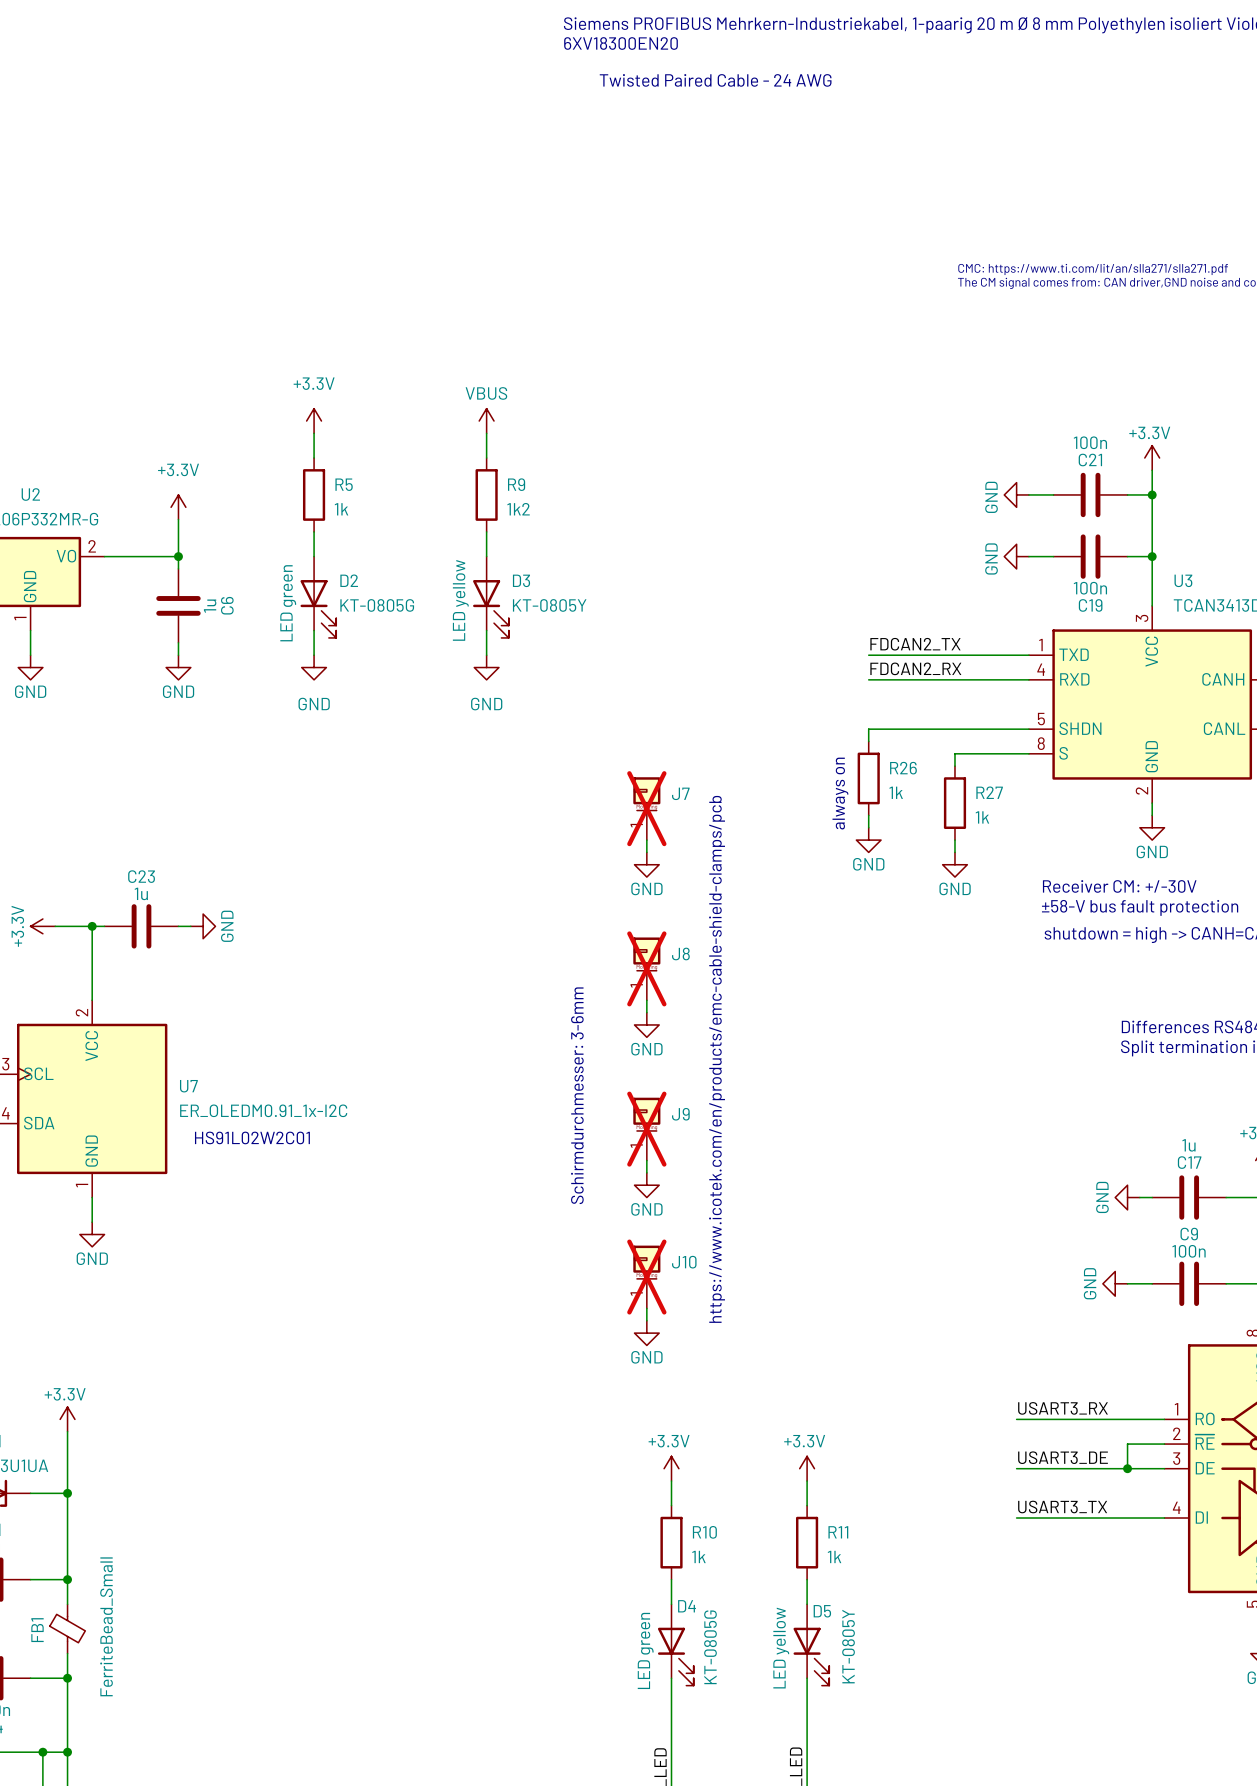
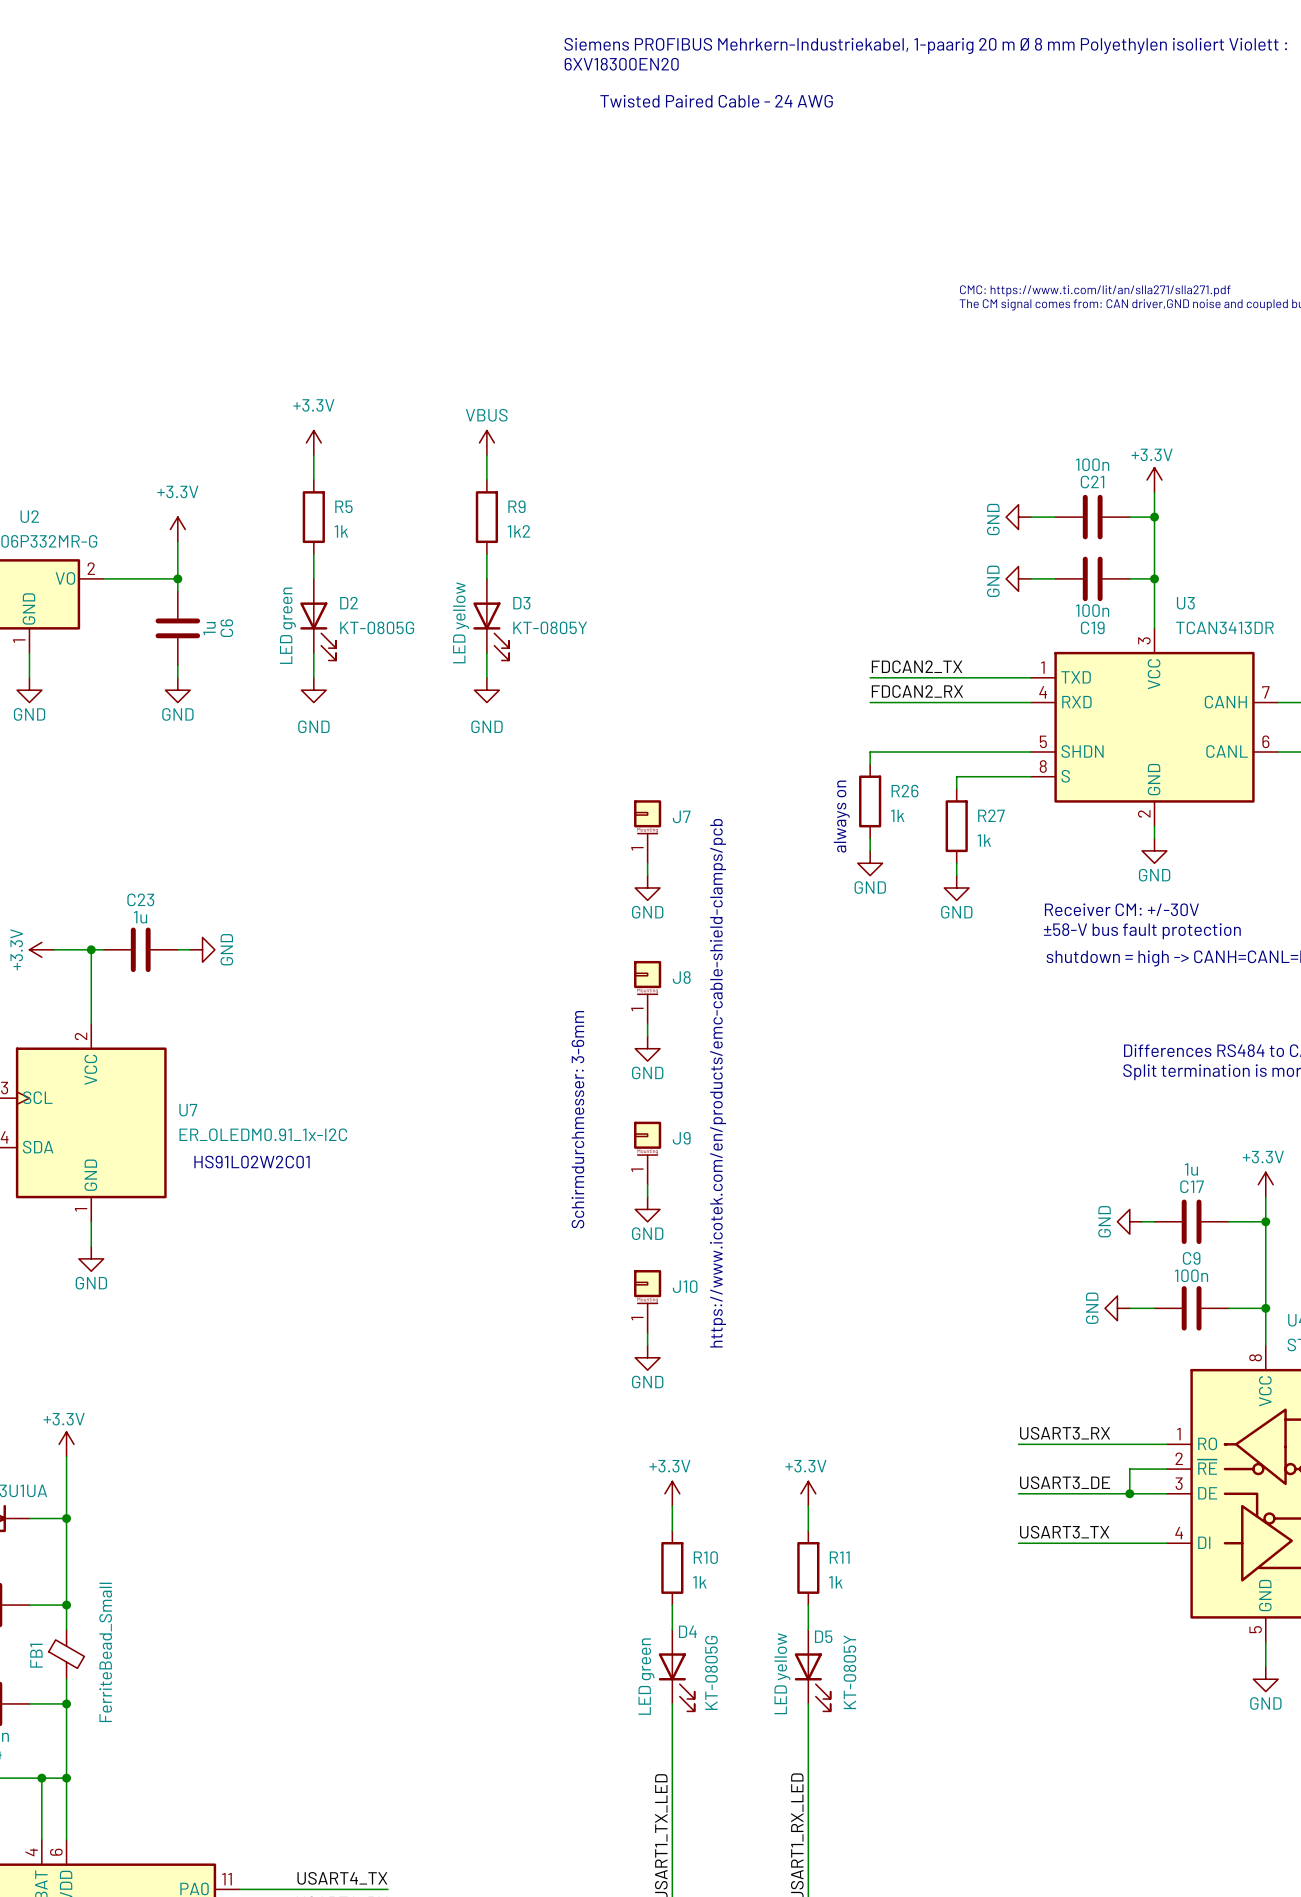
J7 do-not-place cross: (646, 808) -> none
J8 do-not-place cross: (646, 968) -> none
J9 do-not-place cross: (646, 1129) -> none
J10 do-not-place cross: (646, 1277) -> none

